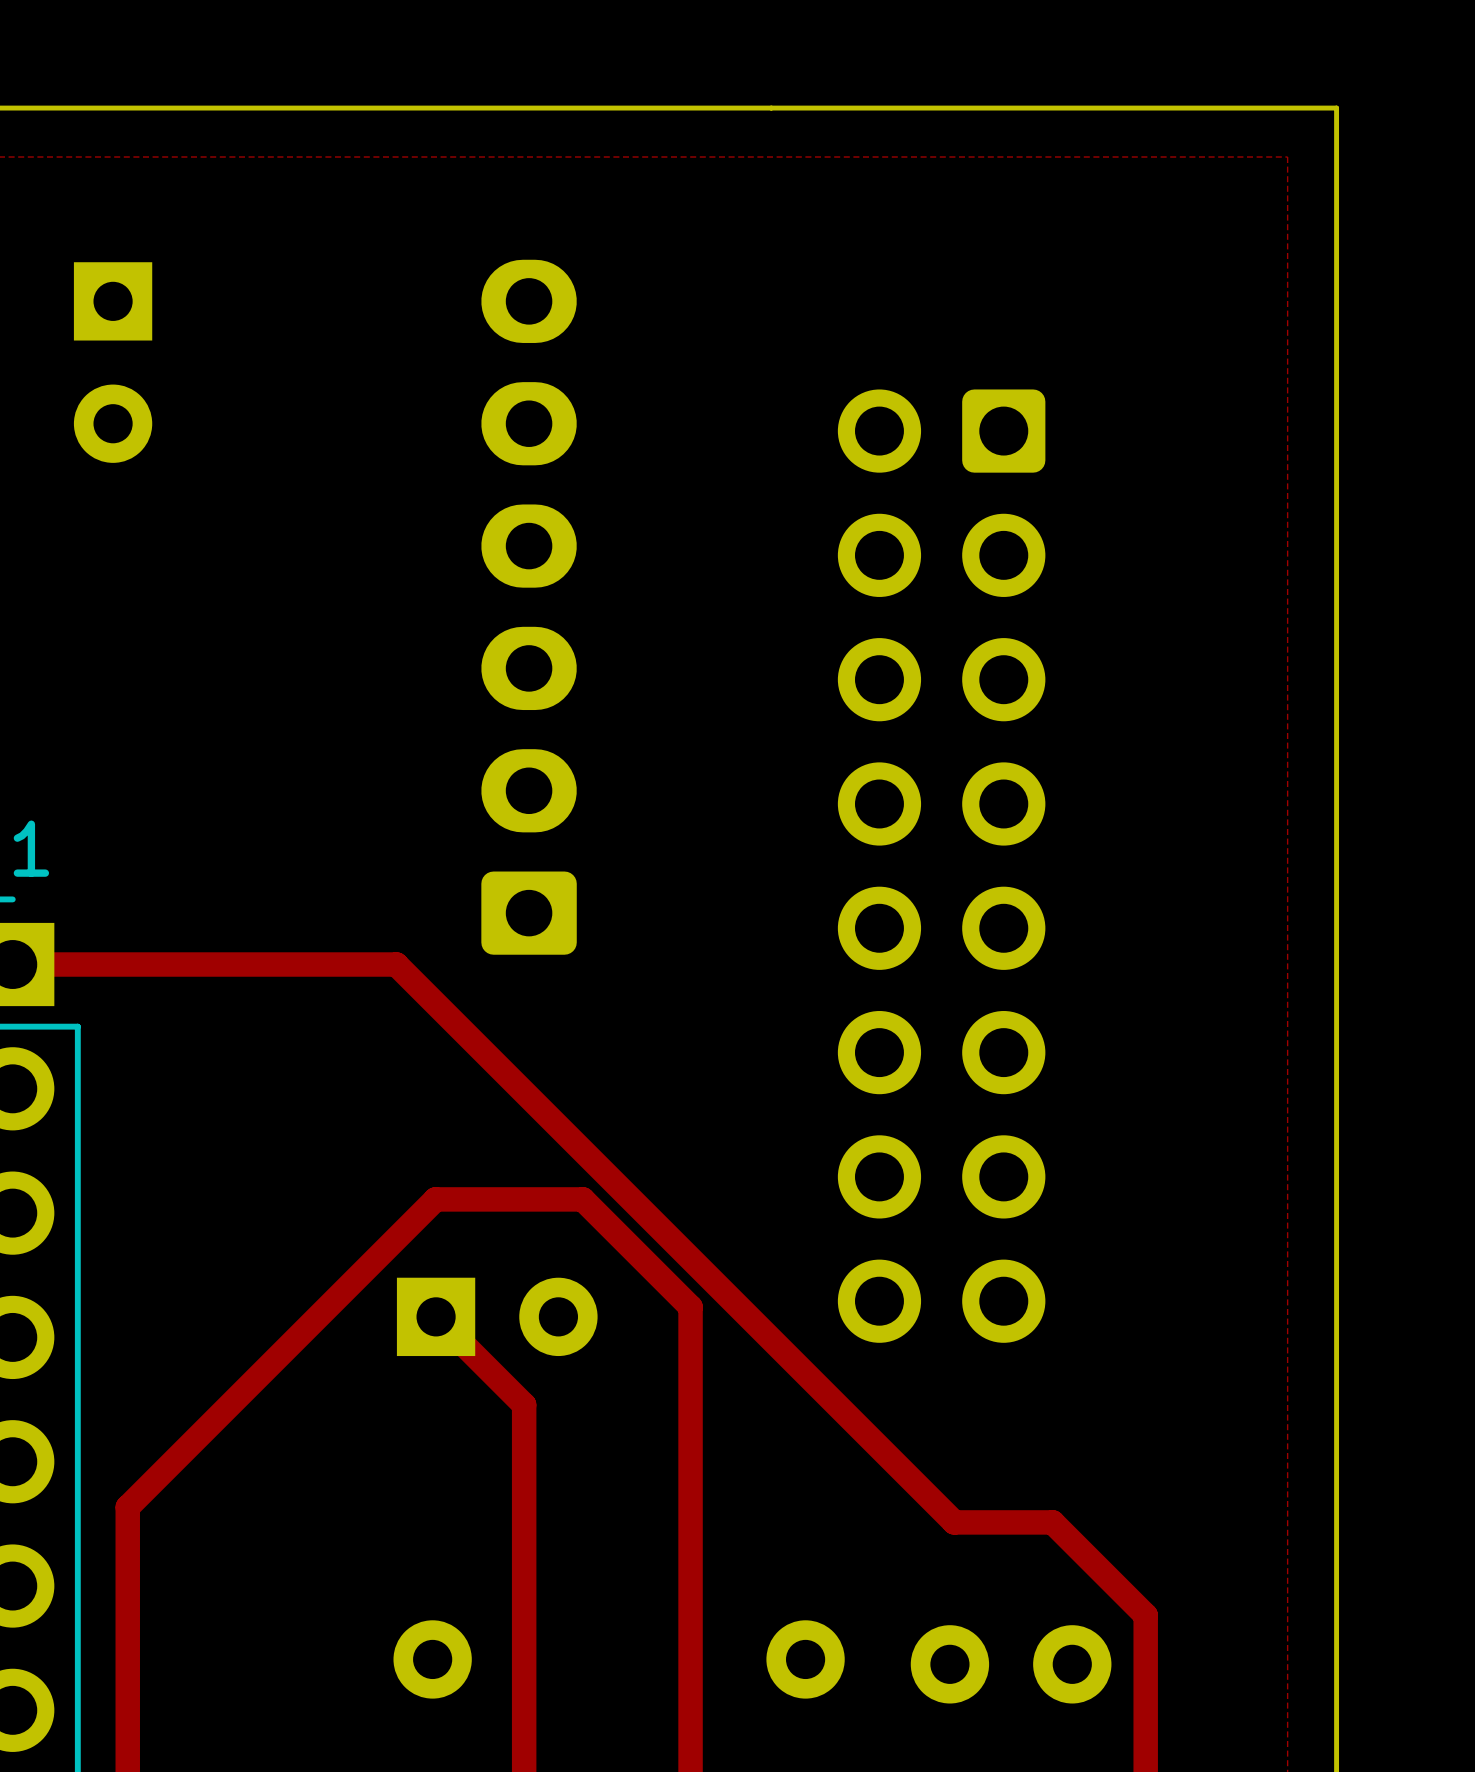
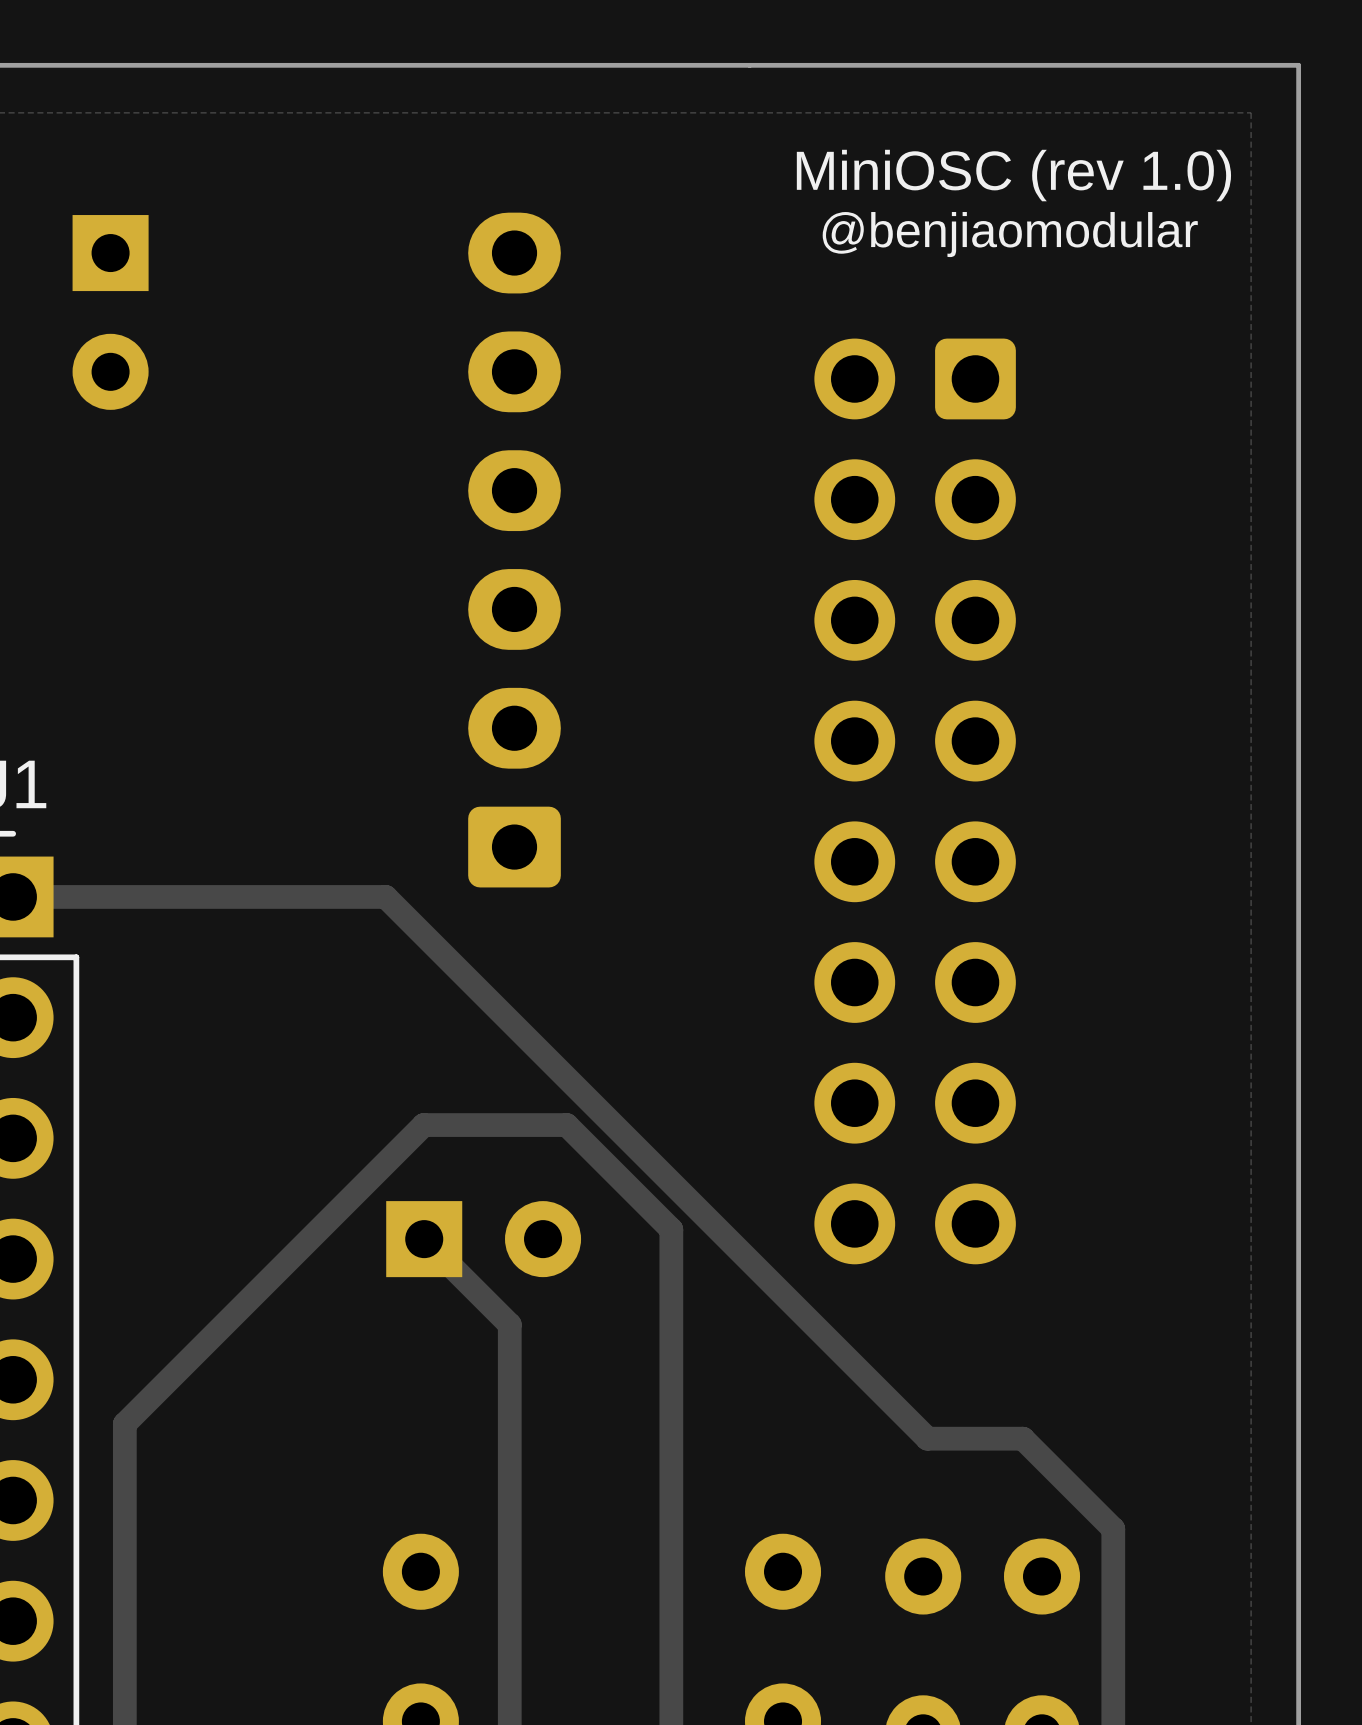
text: none -> MiniOSC (rev 1.0) (1013, 175)
text: none -> @benjiaomodular (1010, 234)

